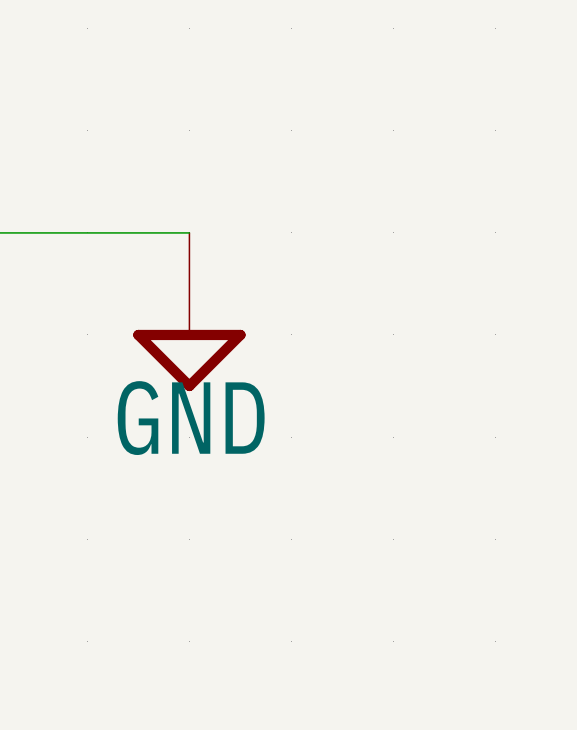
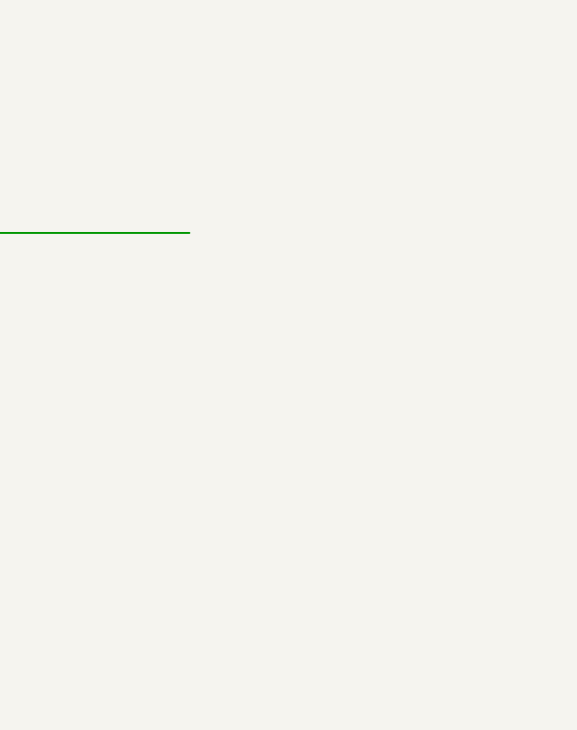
power symbol: GND (189, 312) -> none

